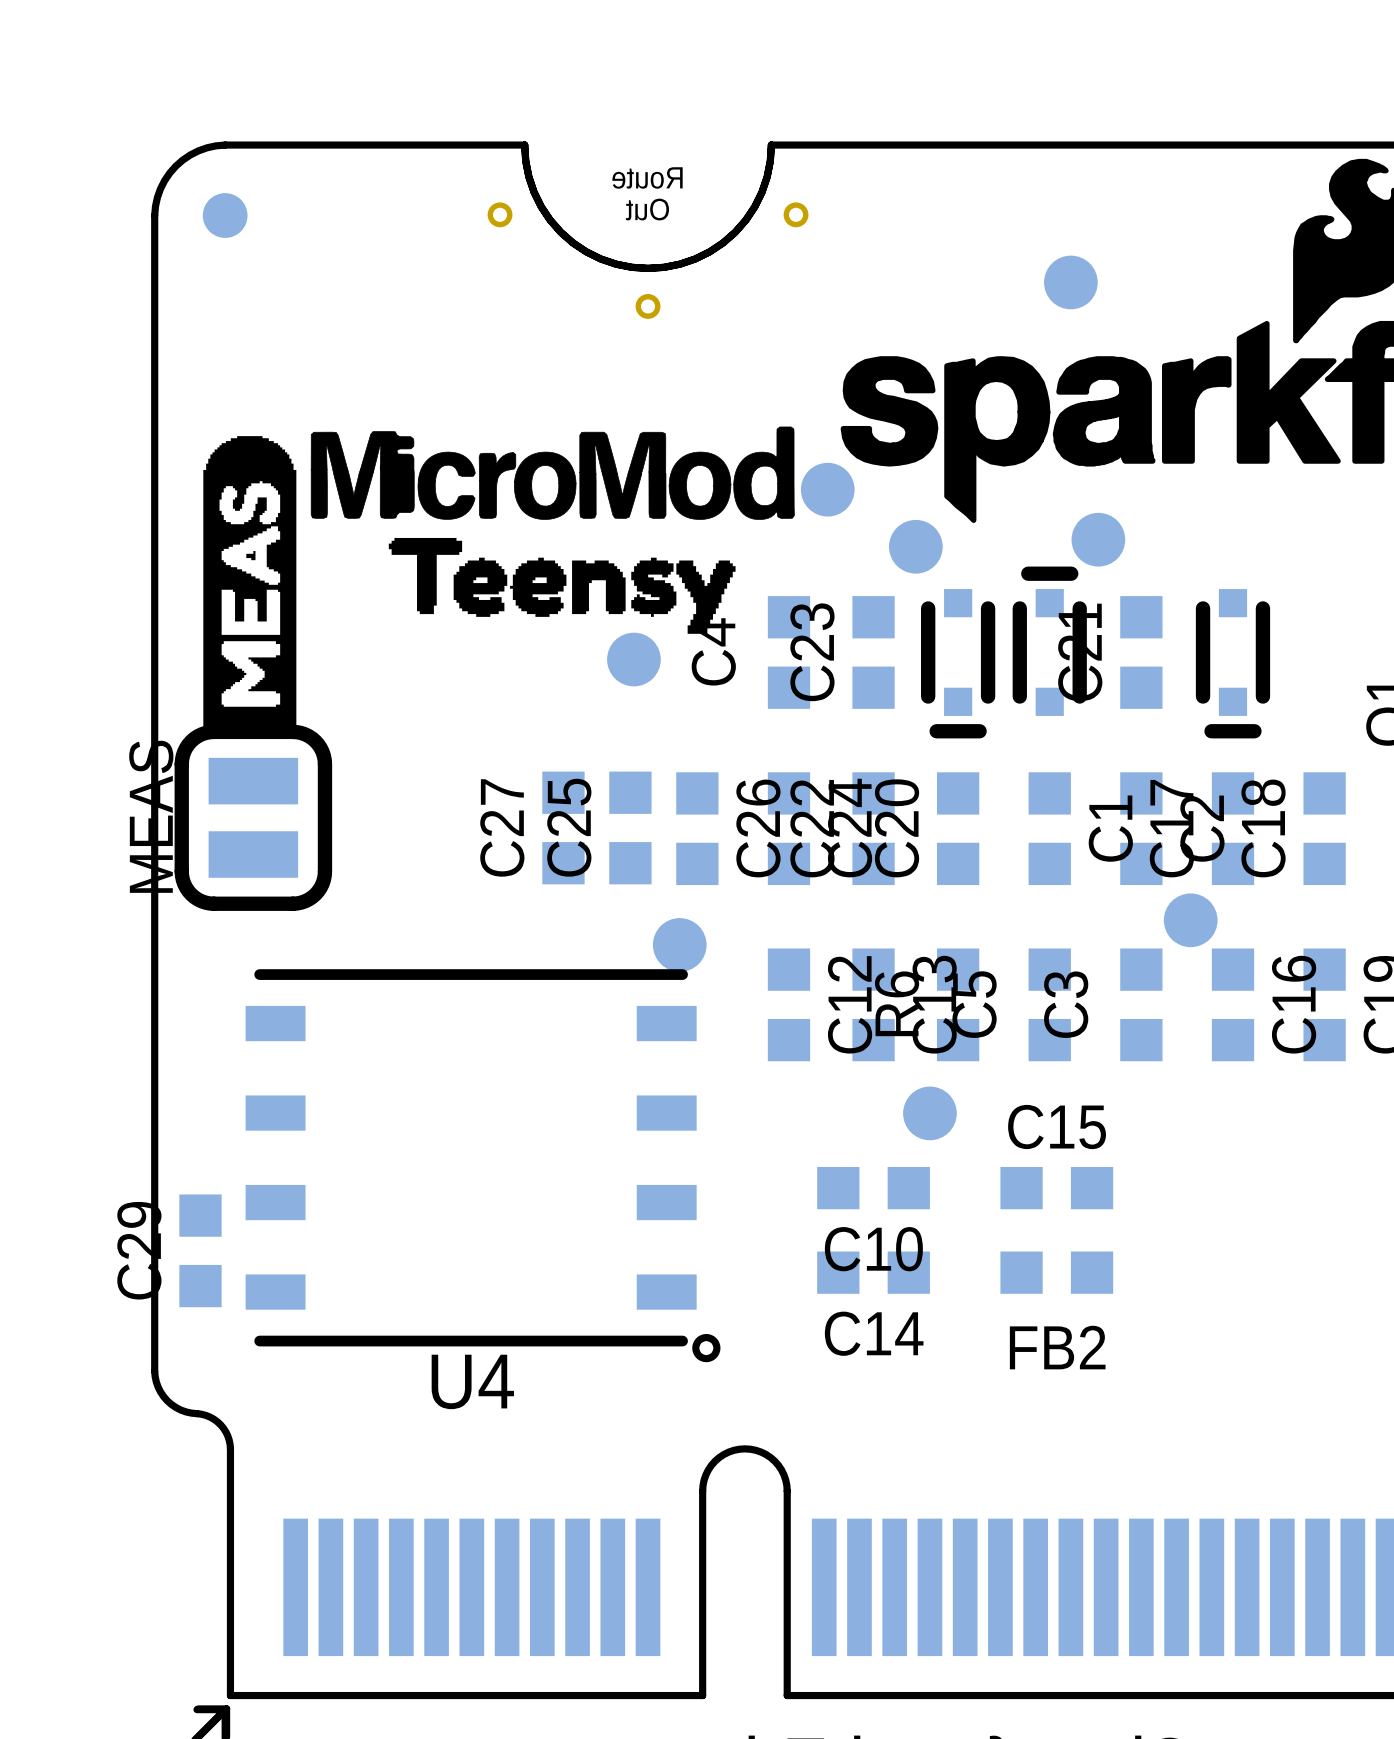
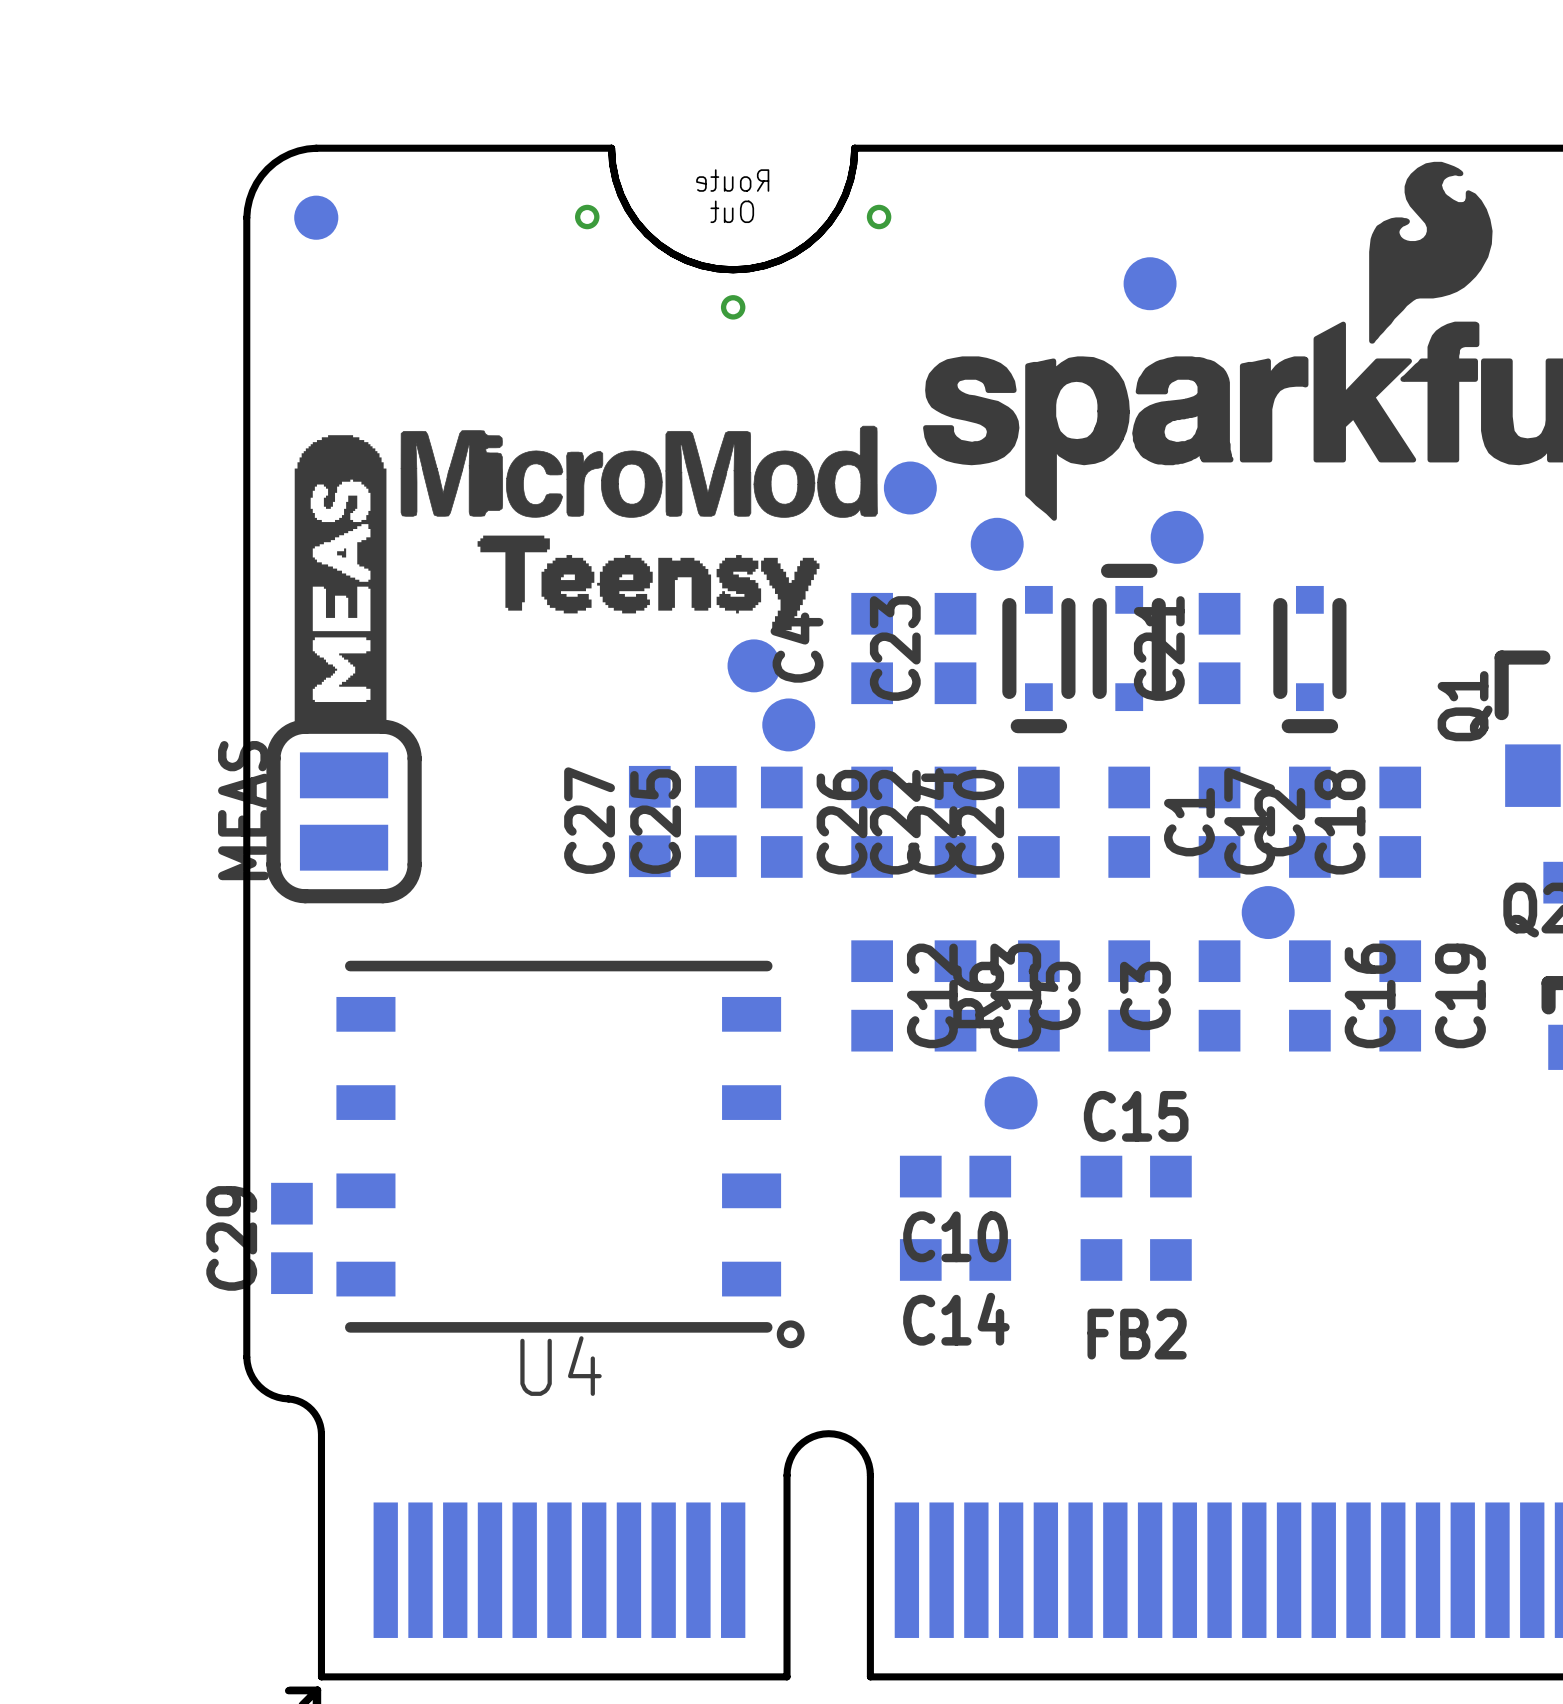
part position: (633, 659) -> (754, 665)
part position: (679, 944) -> (788, 724)

